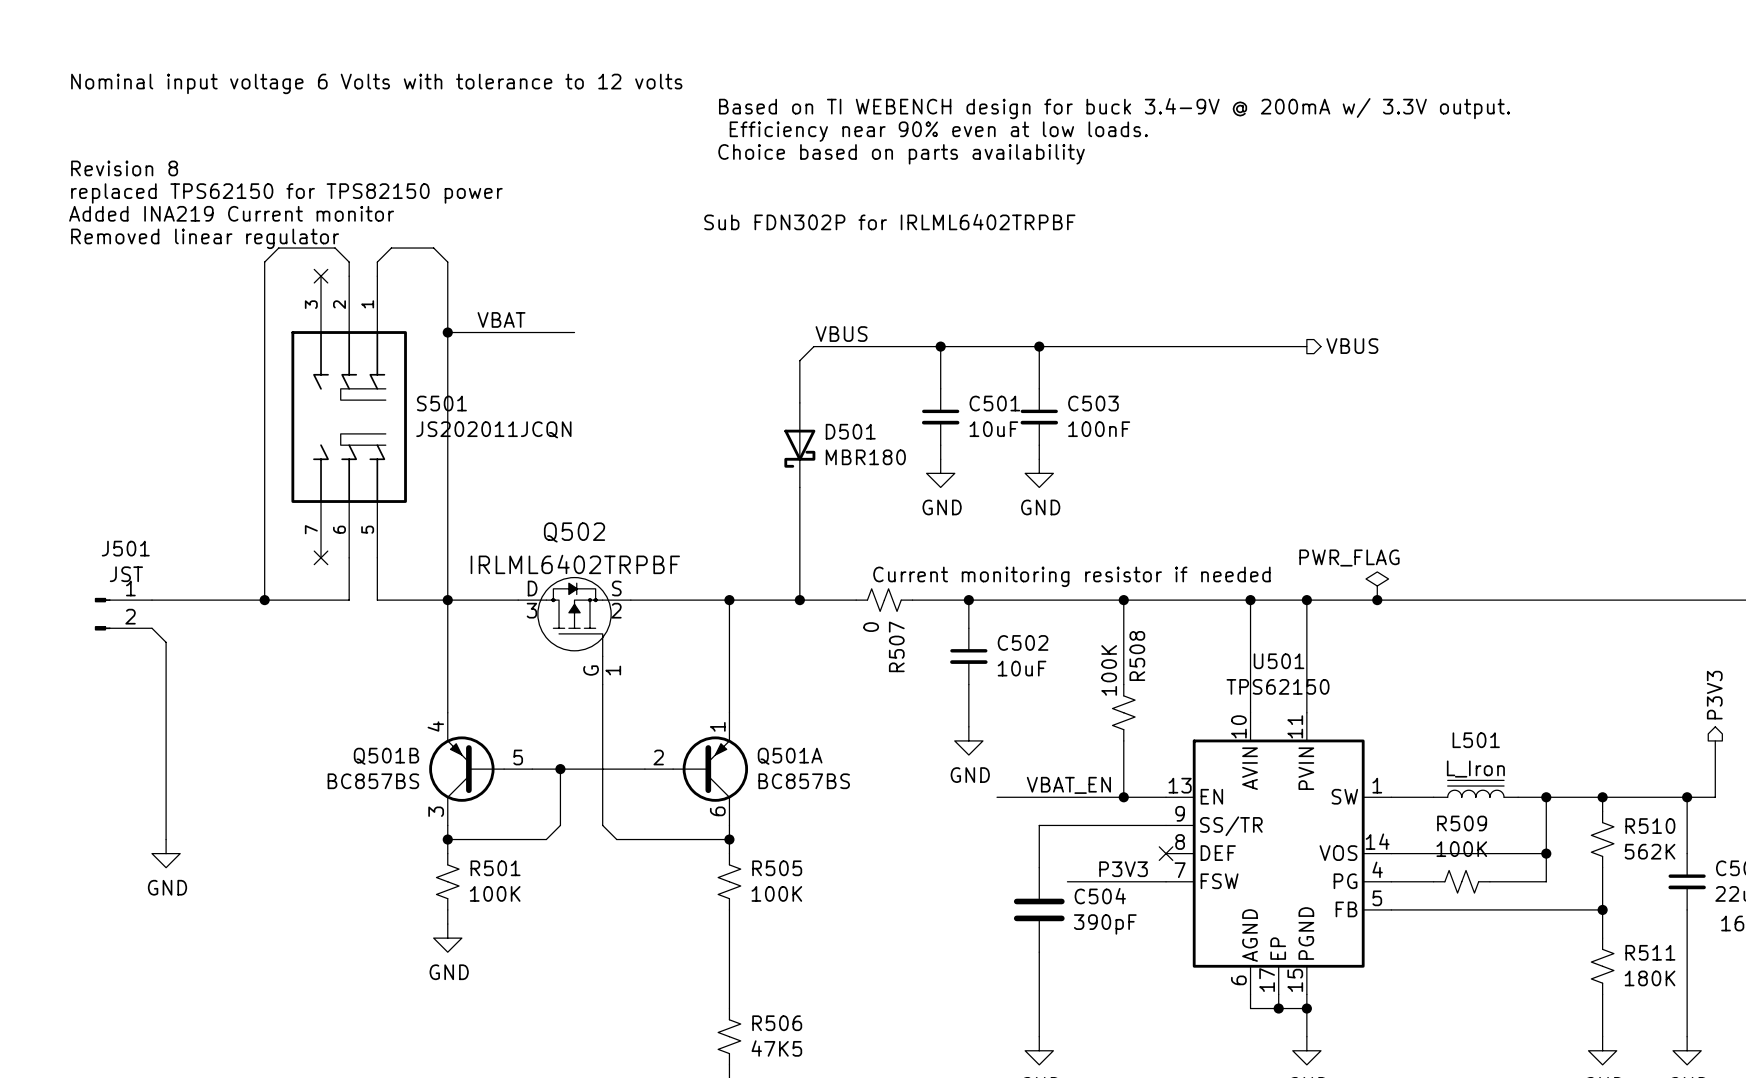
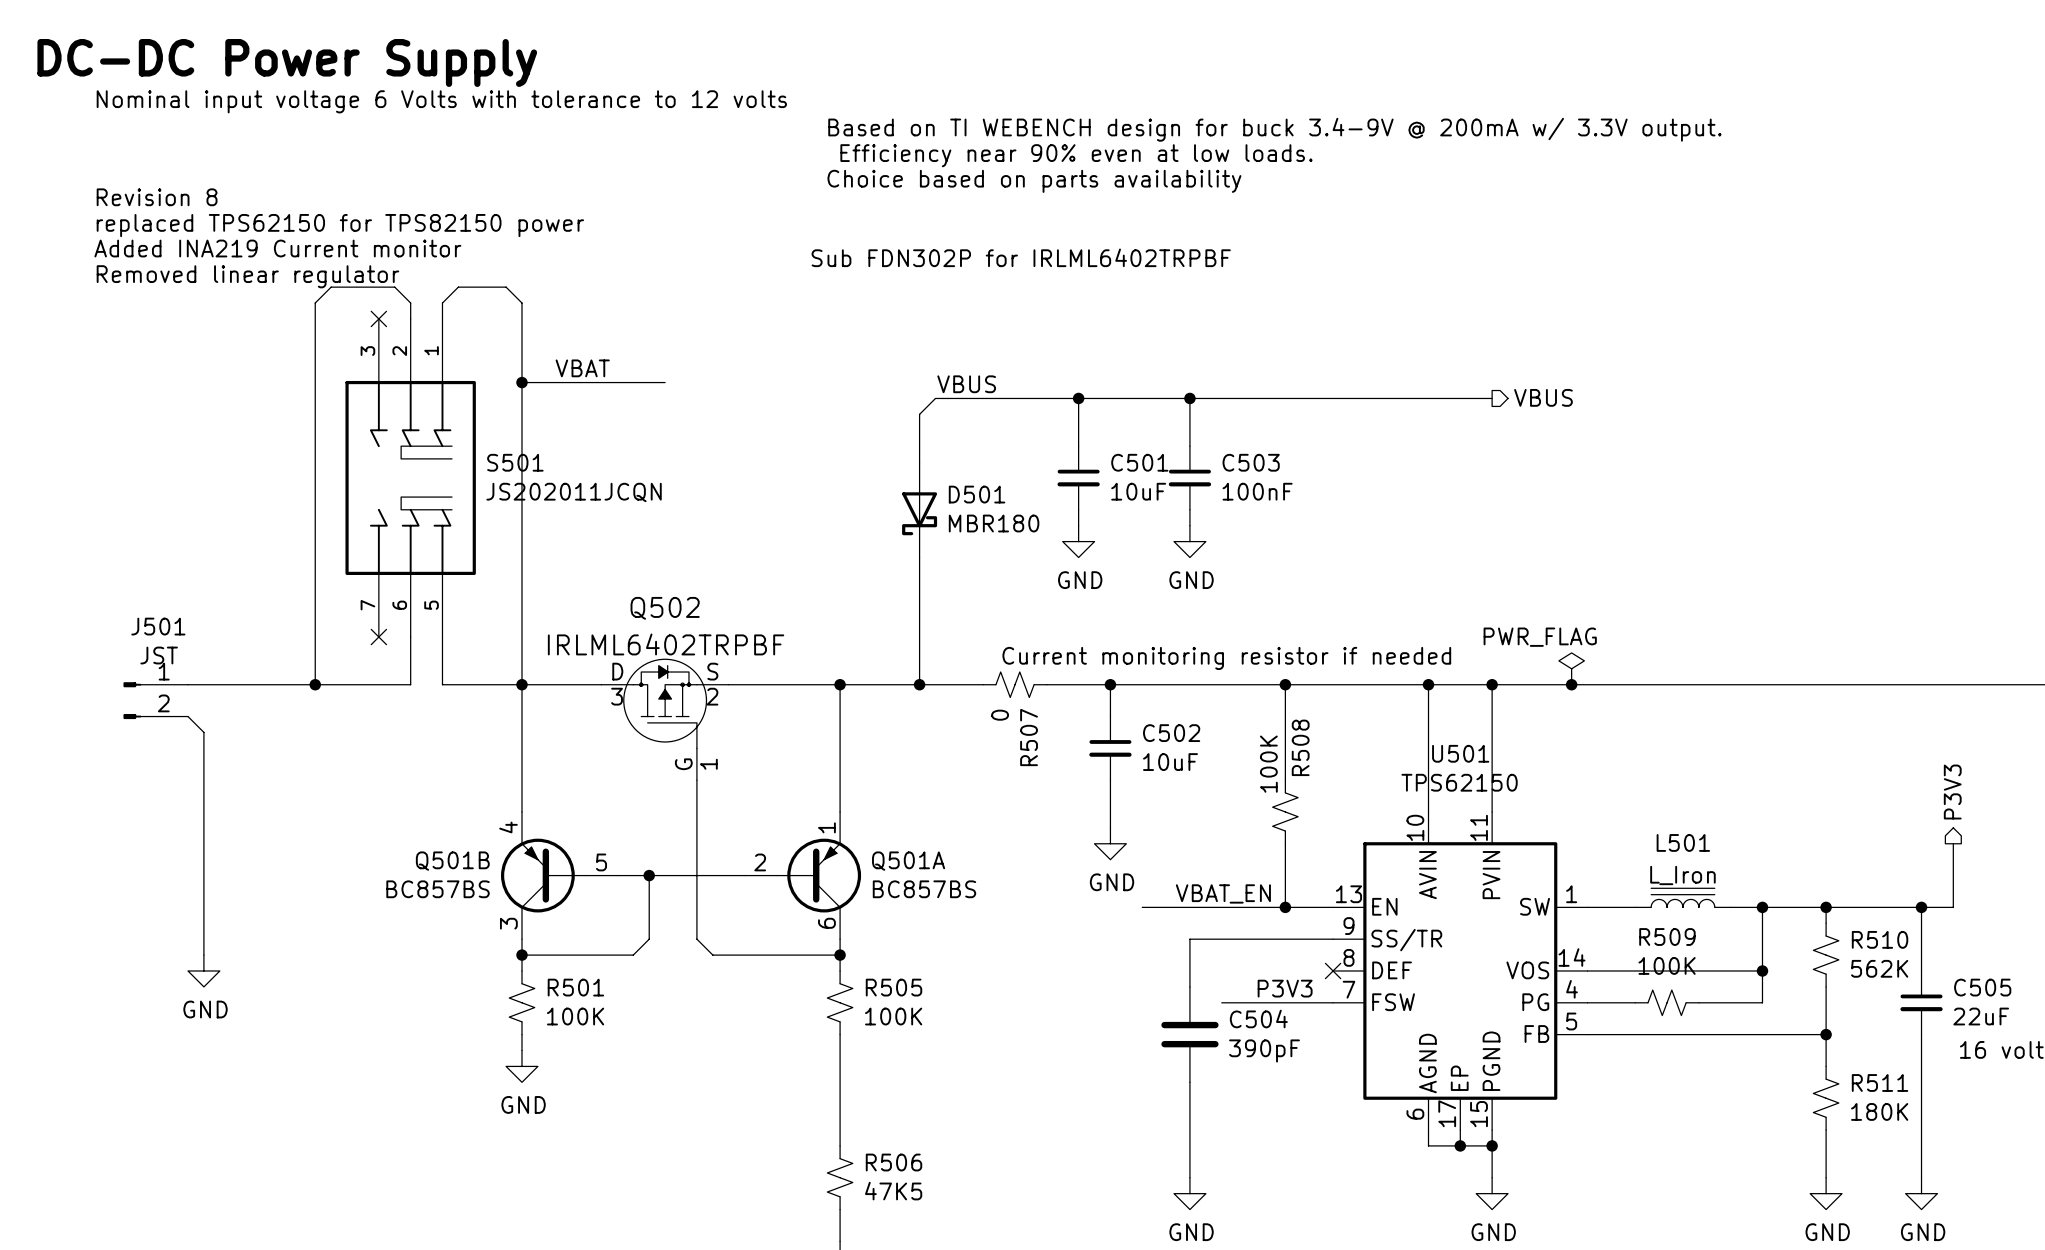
text: none -> DC-DC Power Supply (287, 62)

